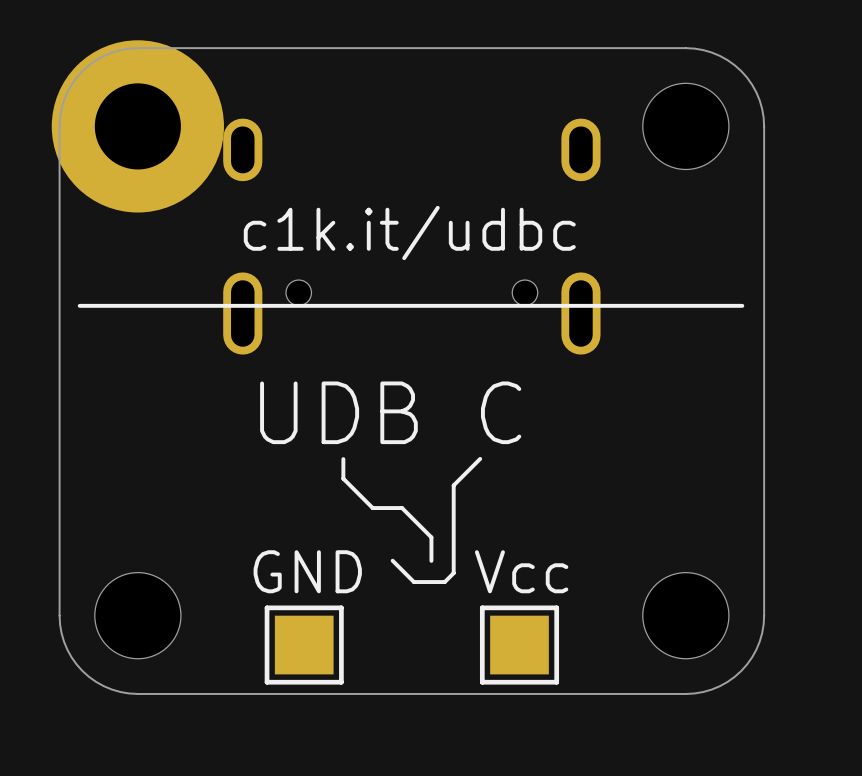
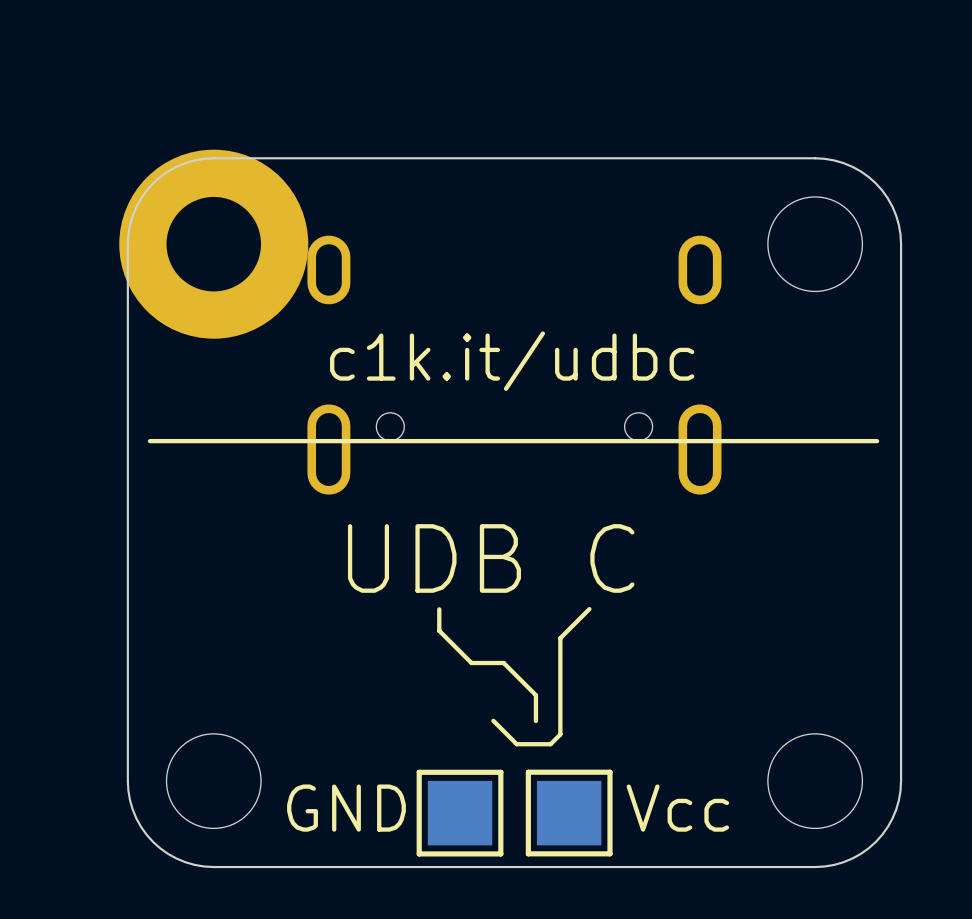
text position: GND (307, 571) -> GND (346, 808)
text position: Vcc (521, 571) -> Vcc (677, 808)
part position: (304, 645) -> (460, 813)
part position: (519, 645) -> (569, 813)

